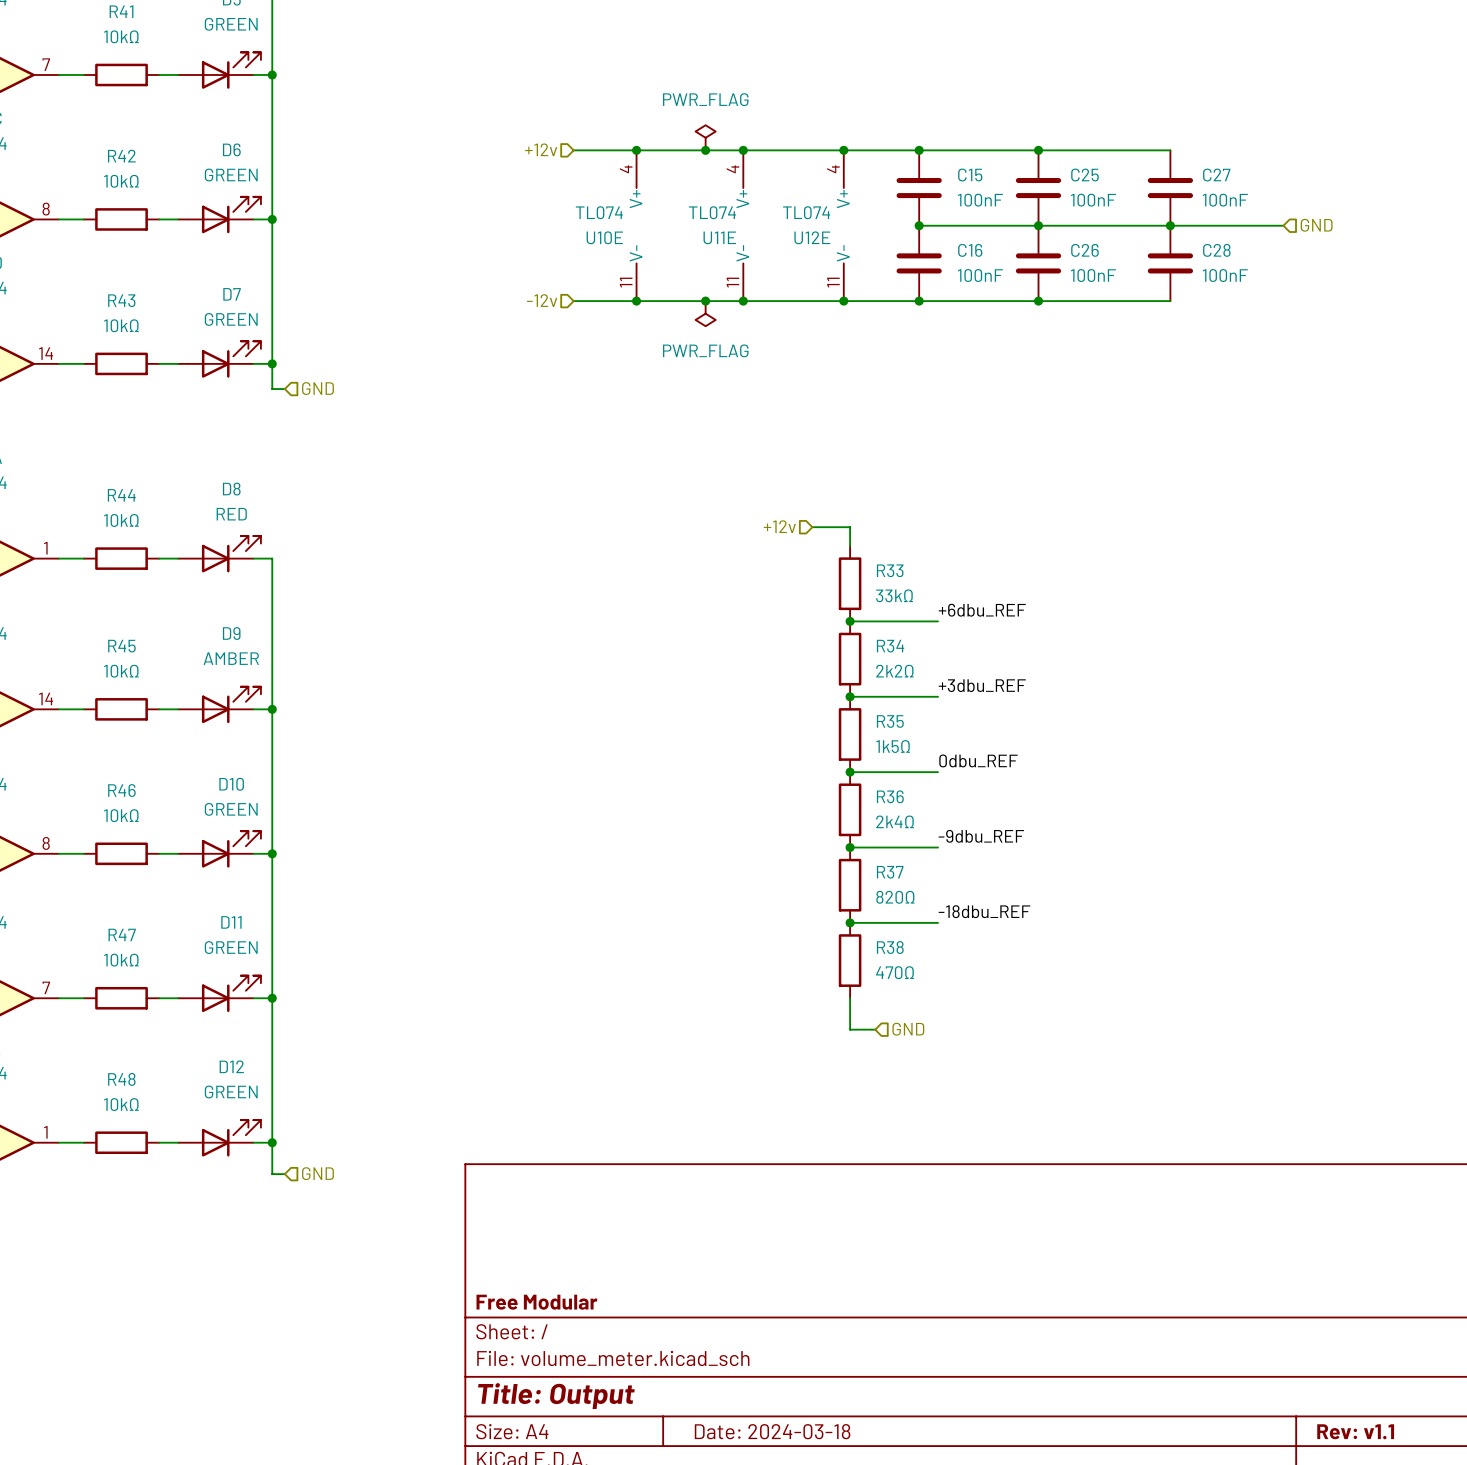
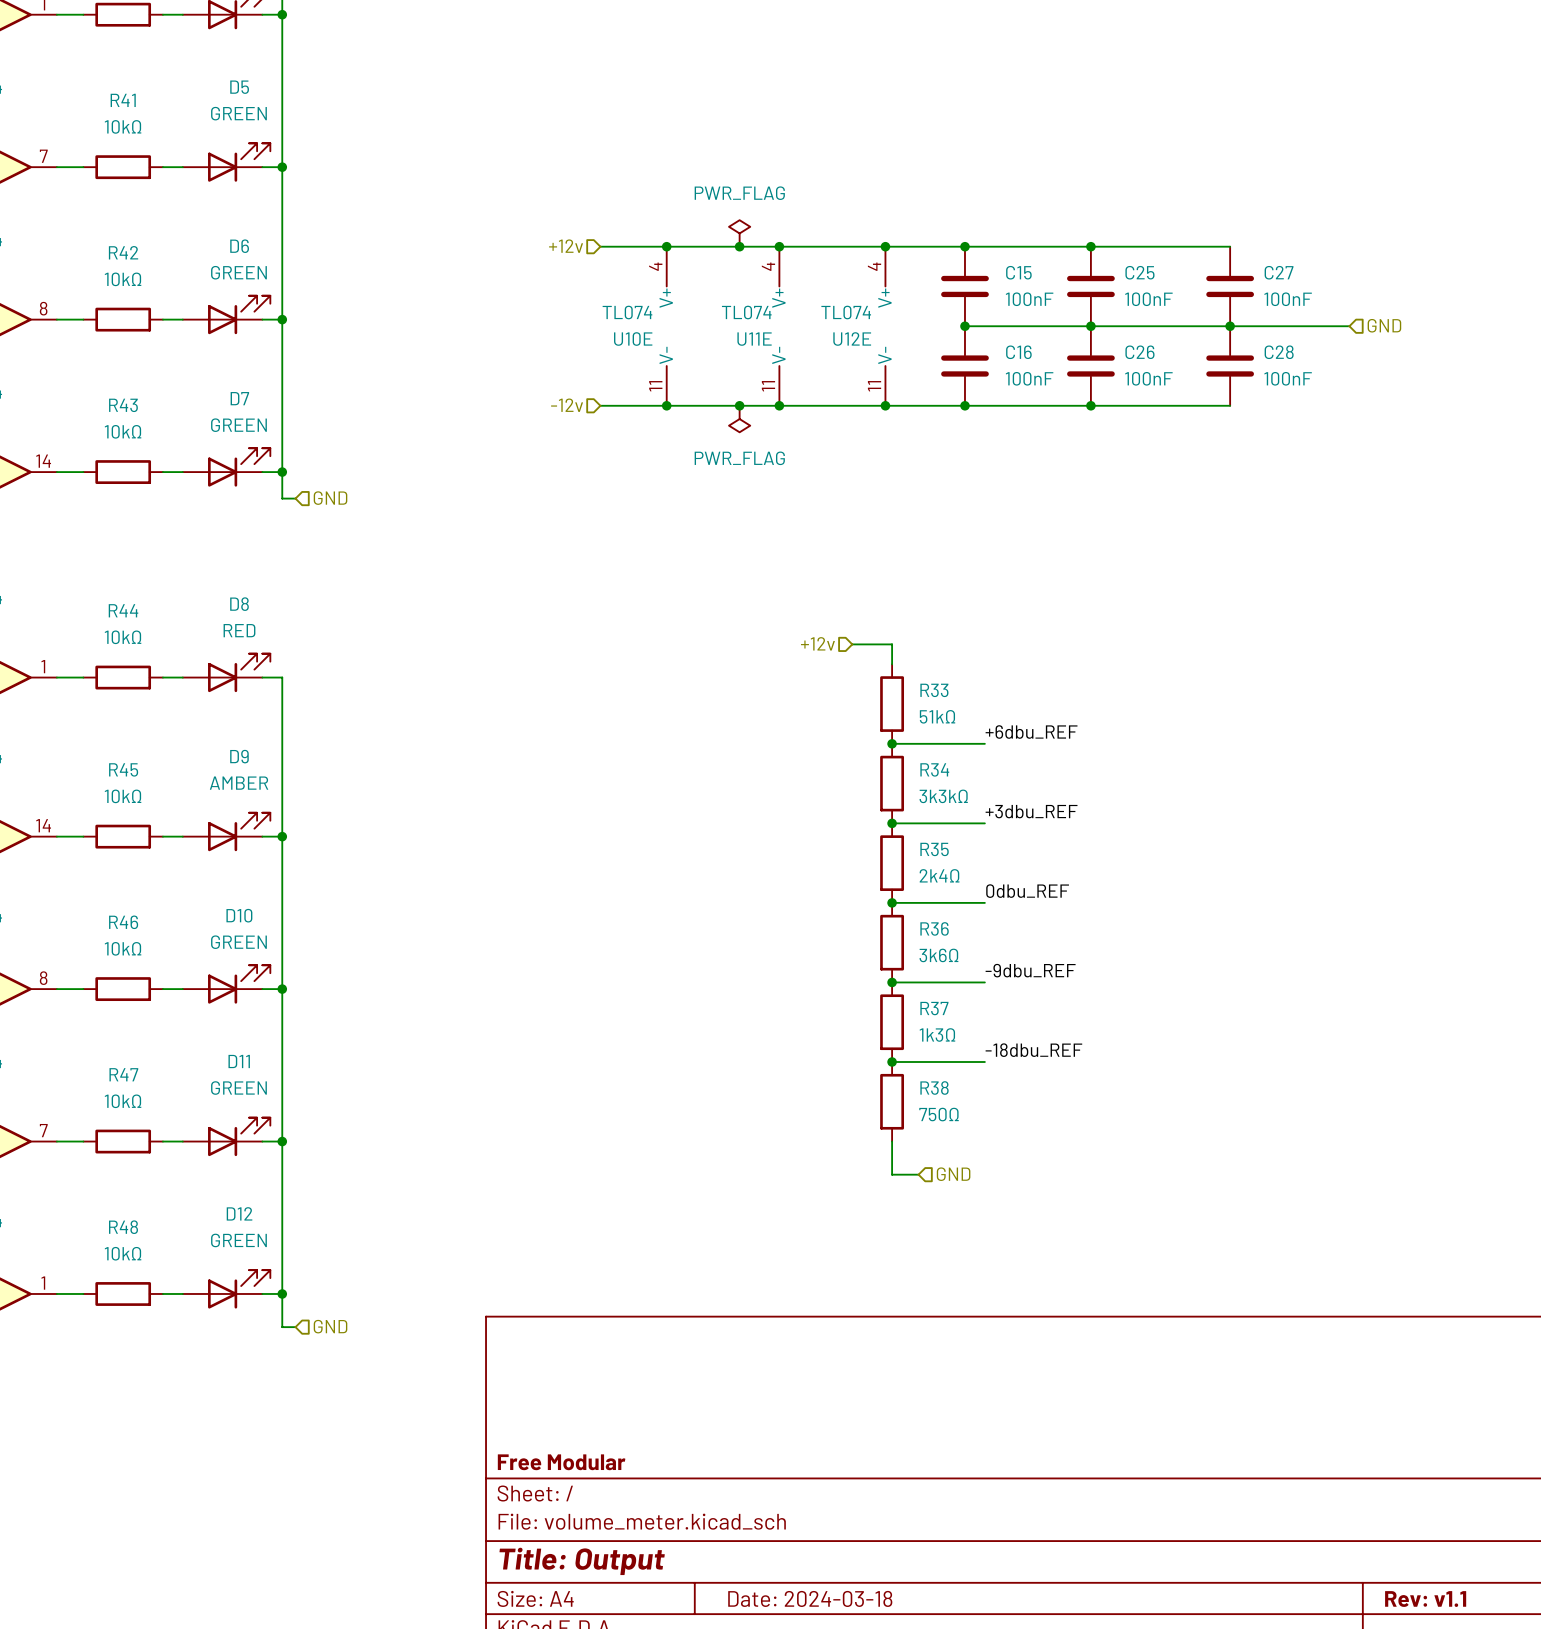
R33 value: 33kΩ (894, 595) -> 51kΩ (937, 716)
R34 value: 2k2Ω (894, 671) -> 3k3kΩ (943, 796)
R35 value: 1k5Ω (893, 746) -> 2k4Ω (939, 875)
R36 value: 2k4Ω (895, 821) -> 3k6Ω (938, 955)
R37 value: 820Ω (895, 897) -> 1k3Ω (937, 1034)
R38 value: 470Ω (895, 972) -> 750Ω (939, 1114)

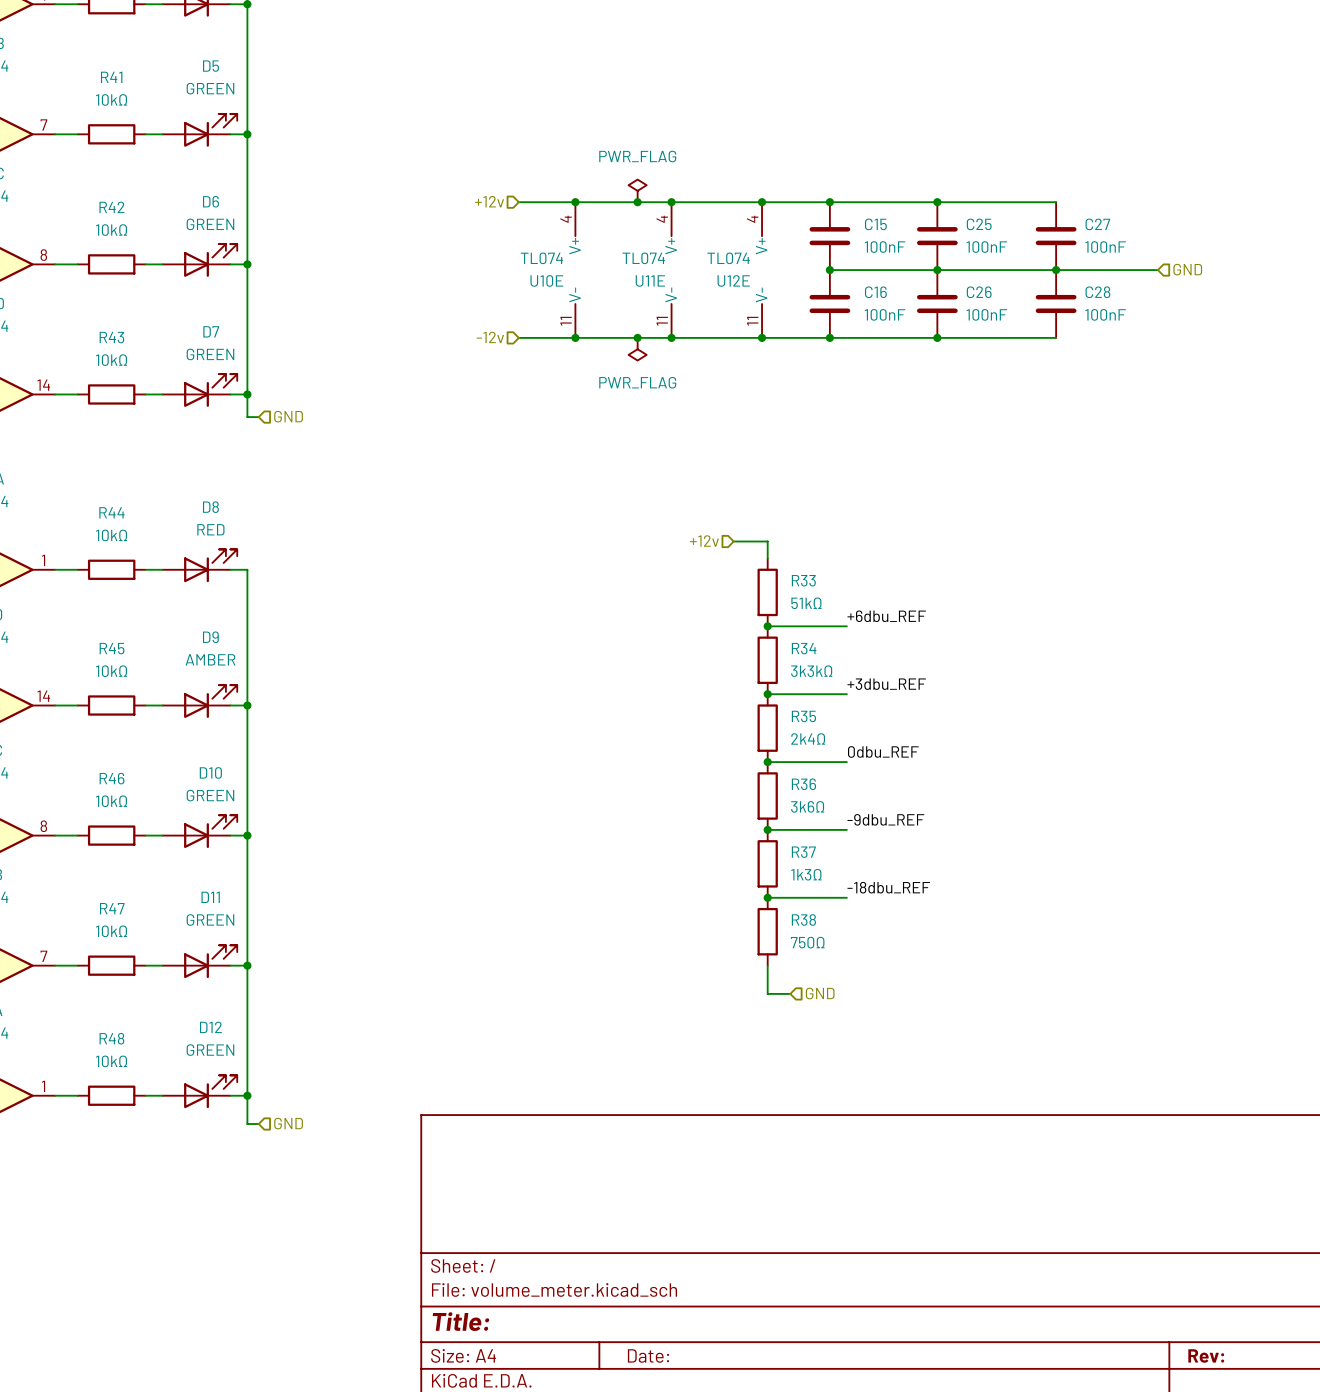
title block: Free Modular (561, 1462) -> none
title block: Title: Output (582, 1561) -> Title: (461, 1321)
title block: Date: 2024-03-18 (810, 1598) -> Date: (648, 1355)
title block: Rev: v1.1 (1425, 1599) -> Rev: (1206, 1355)

